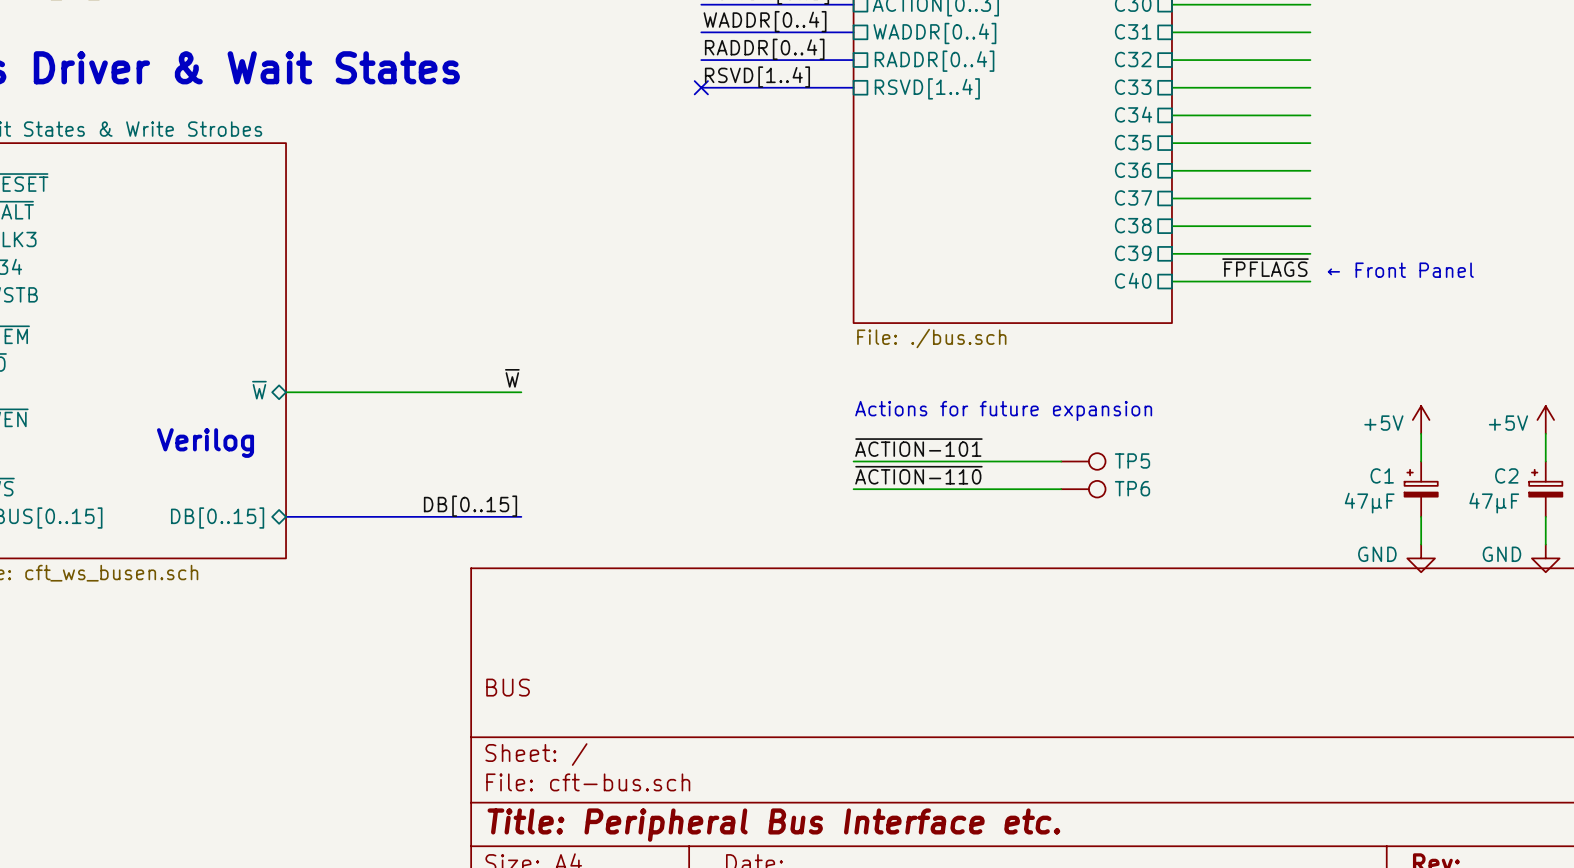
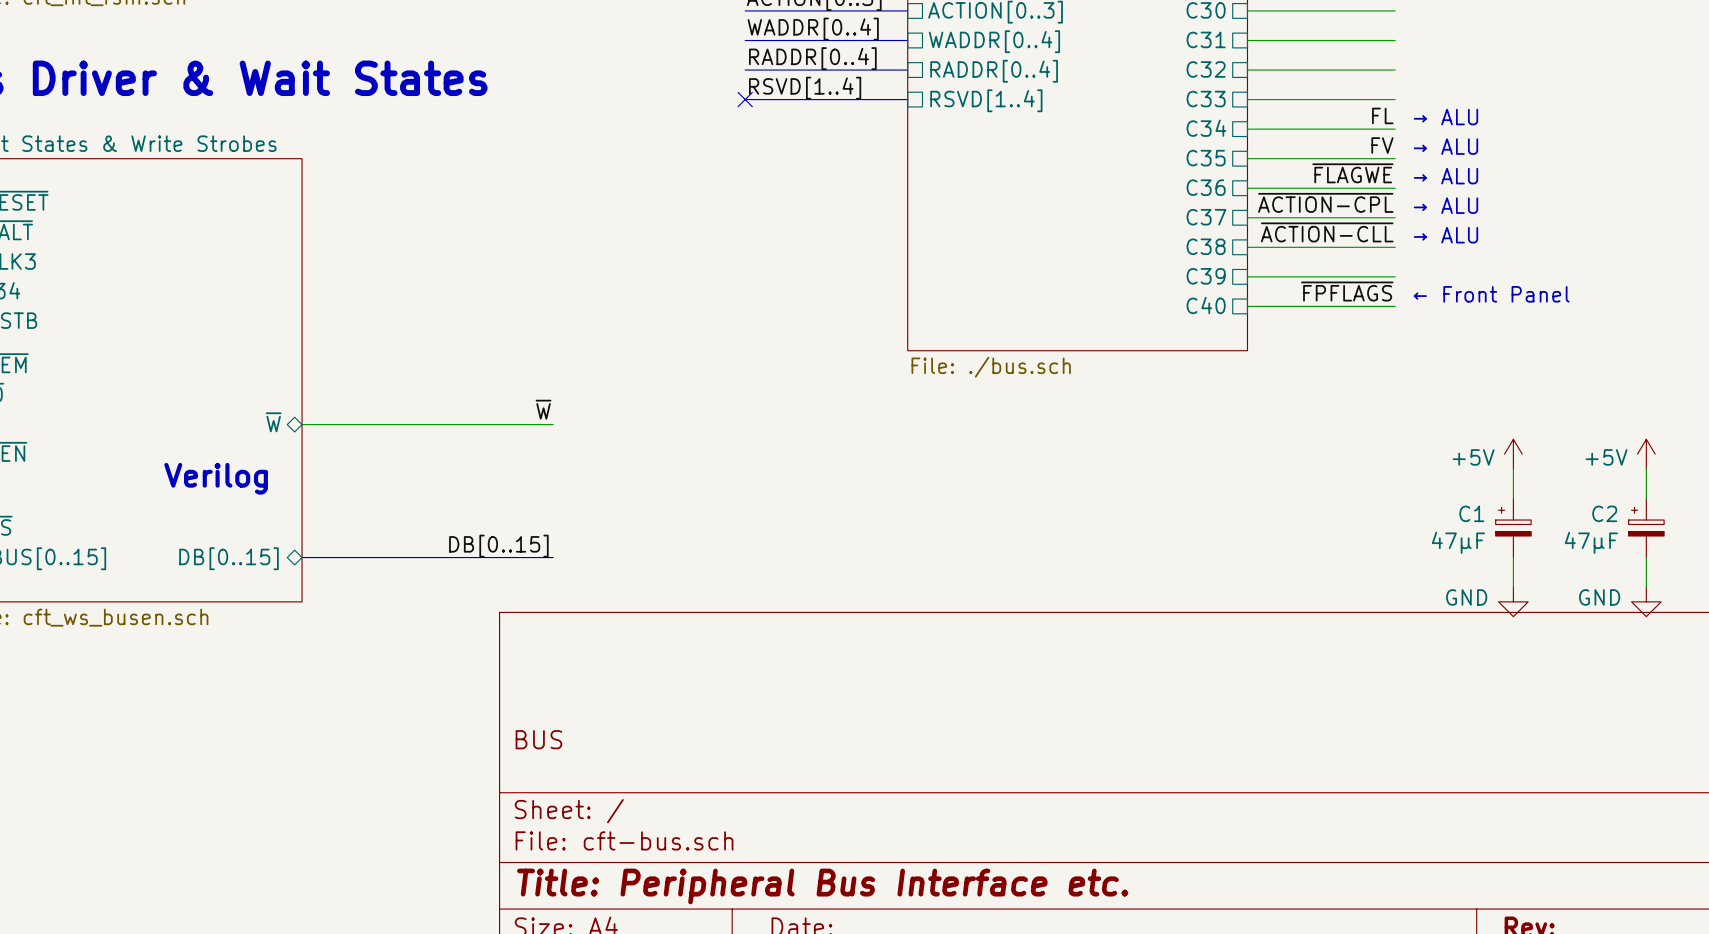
label: none -> FL (1382, 115)
text: none -> → ALU (1445, 117)
label: none -> FV (1382, 145)
text: none -> → ALU (1445, 146)
label: none -> ~{FLAGWE} (1352, 173)
text: none -> → ALU (1445, 176)
label: none -> ~{ACTION-CPL} (1325, 202)
text: none -> → ALU (1445, 205)
label: none -> ~{ACTION-CLL} (1327, 232)
text: none -> → ALU (1445, 235)
text: Actions for future expansion (1003, 410) -> none
label: ~{ACTION-101} (918, 447) -> none
wire: (853, 461) (1061, 461) -> none
TP5: (1083, 461) -> none
label: ~{ACTION-110} (918, 475) -> none
wire: (853, 489) (1061, 489) -> none
TP6: (1083, 489) -> none

